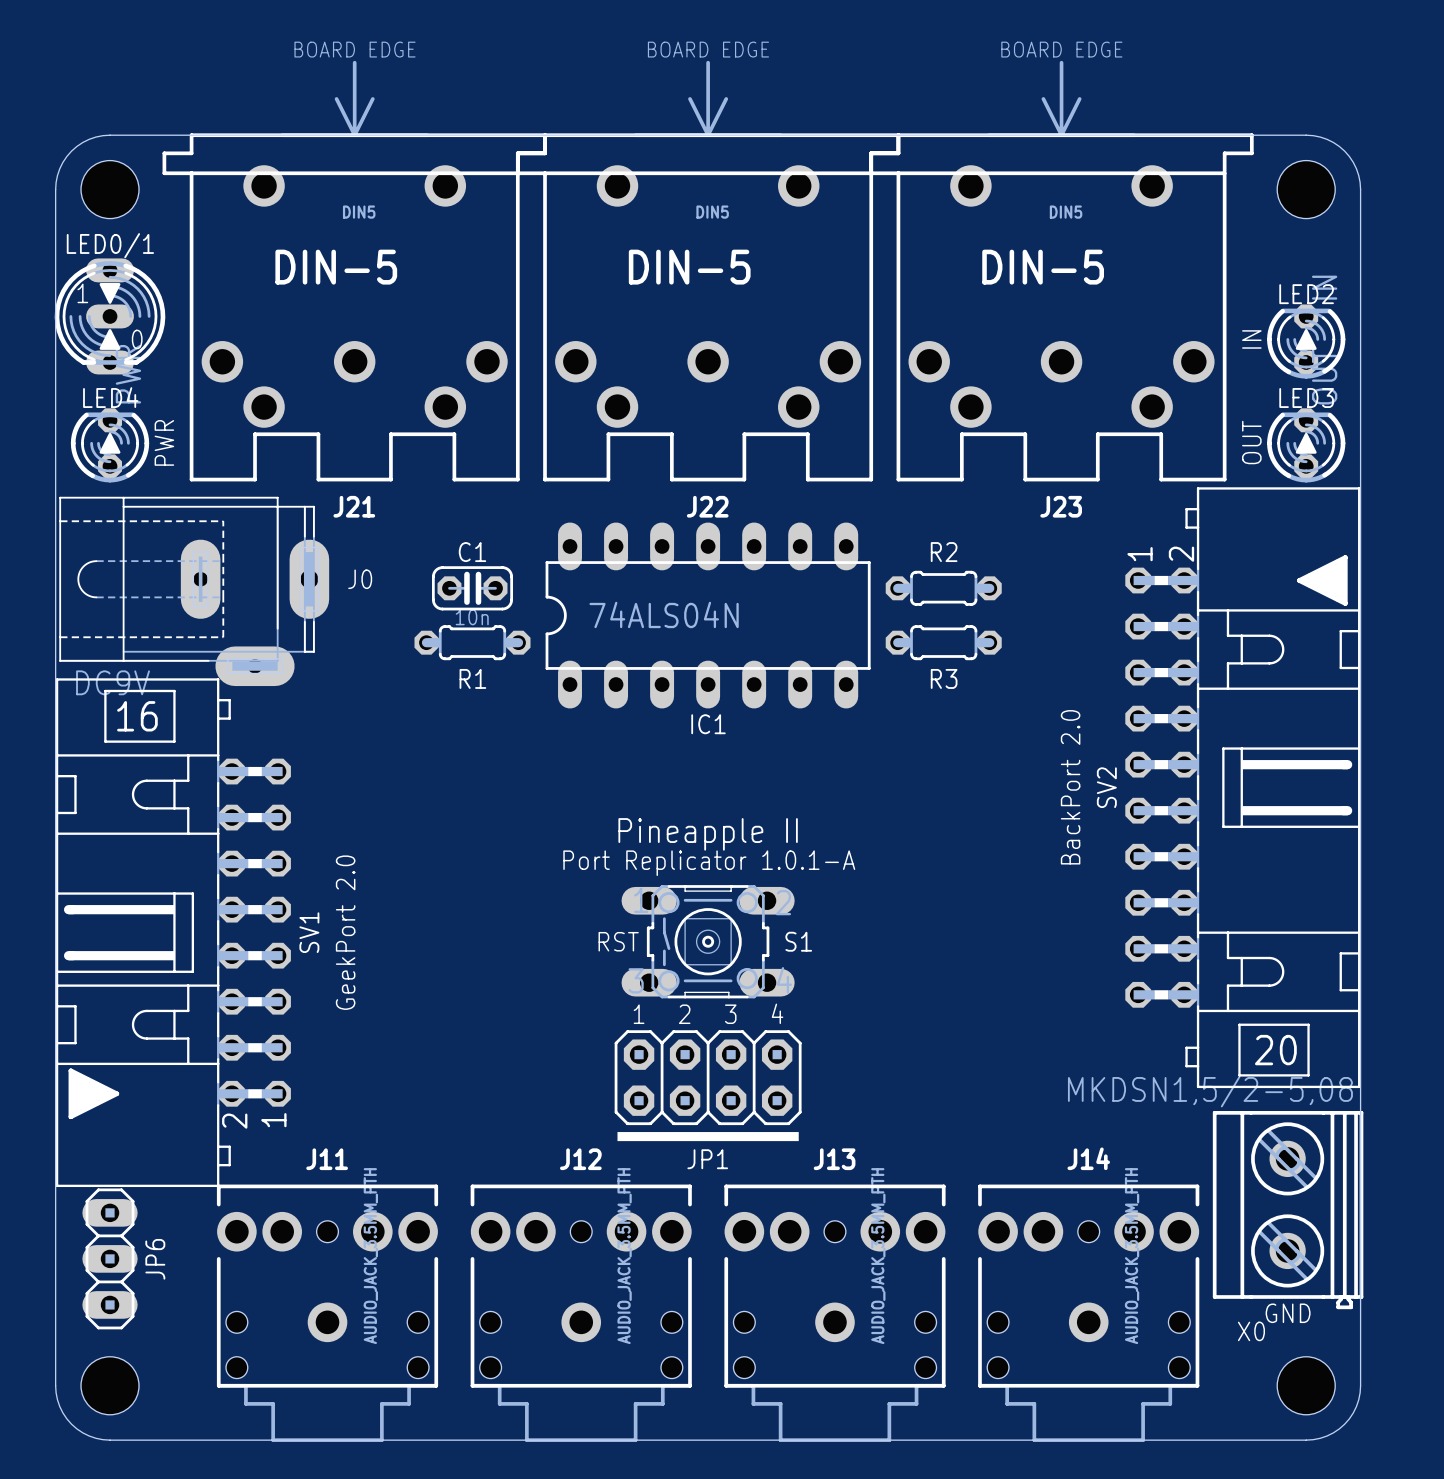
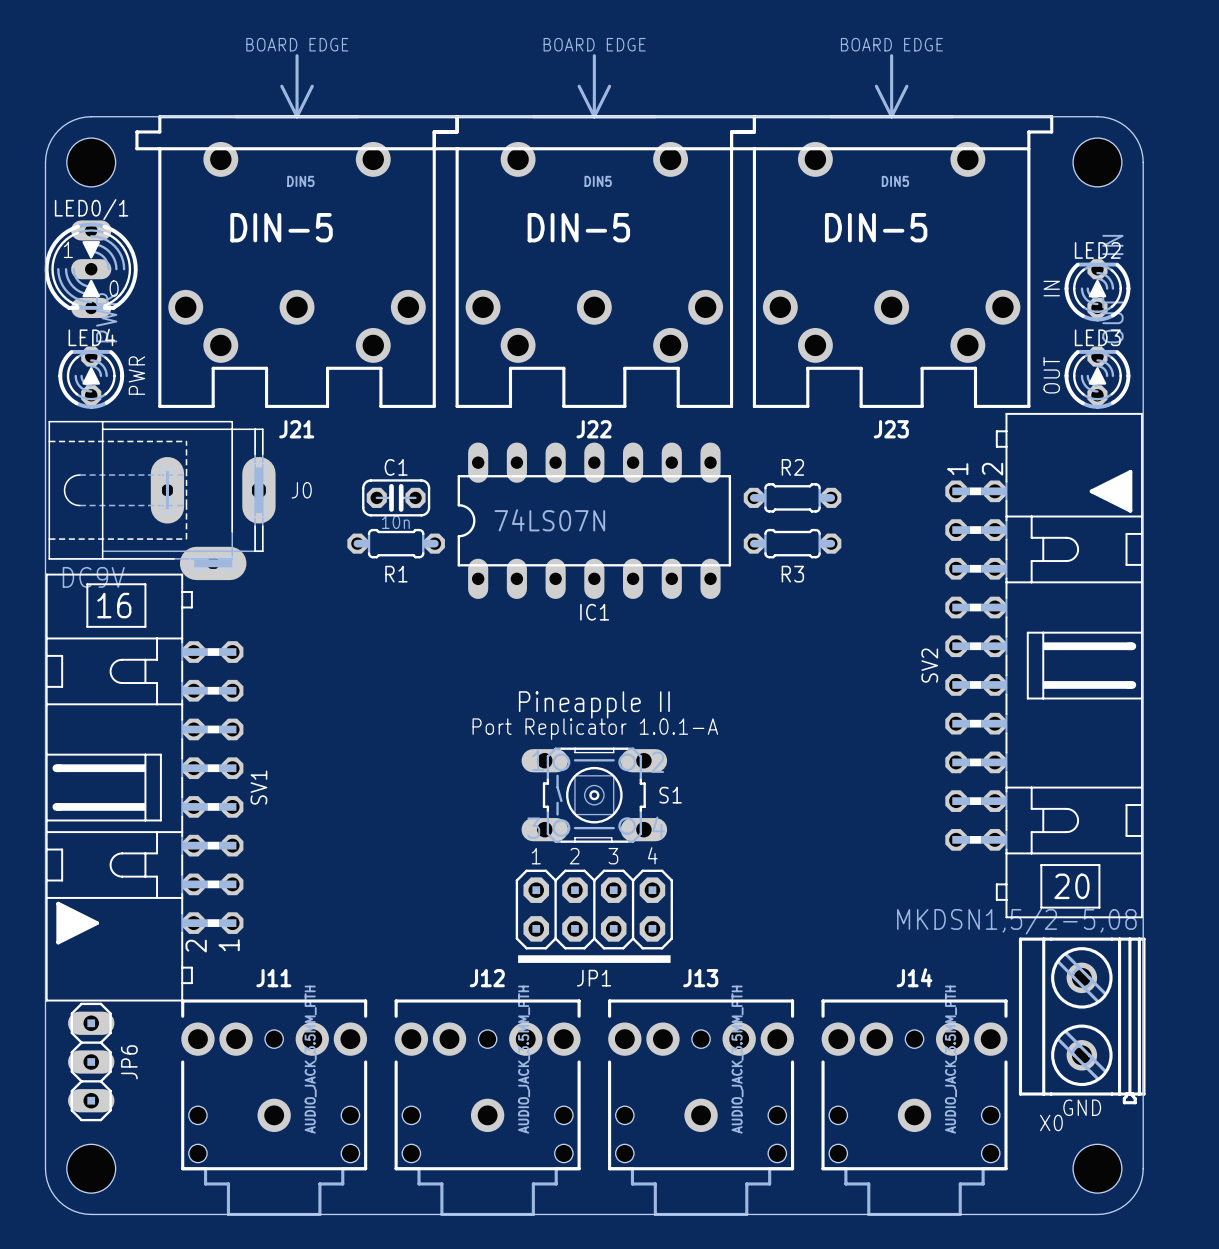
IC1 value: 74ALS04N (664, 614) -> 74LS07N (549, 520)
text: BackPort 2.0 (1070, 787) -> none
text: GeekPort 2.0 (345, 932) -> none
text: RST (618, 941) -> none

